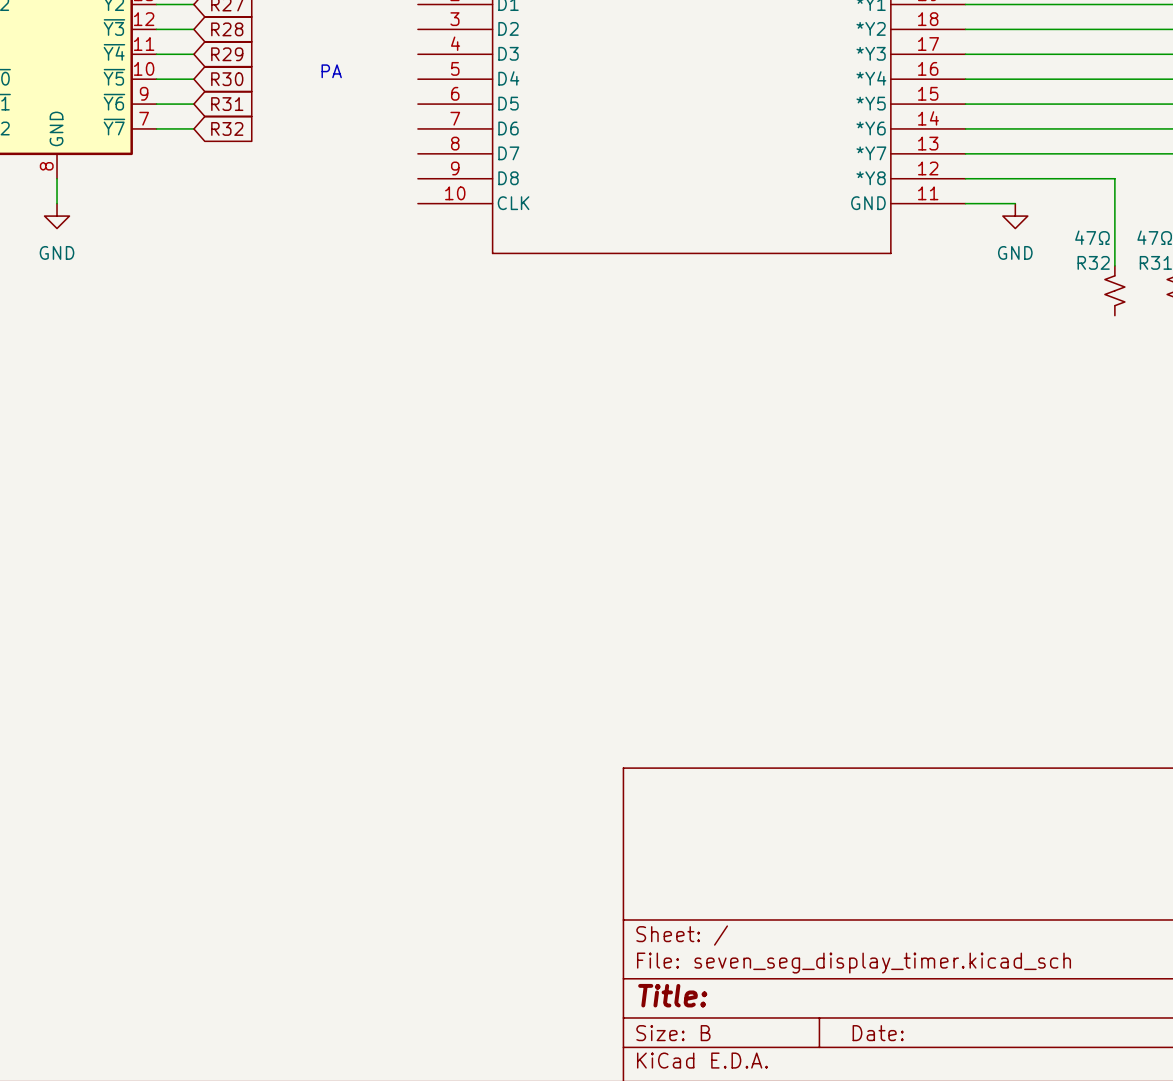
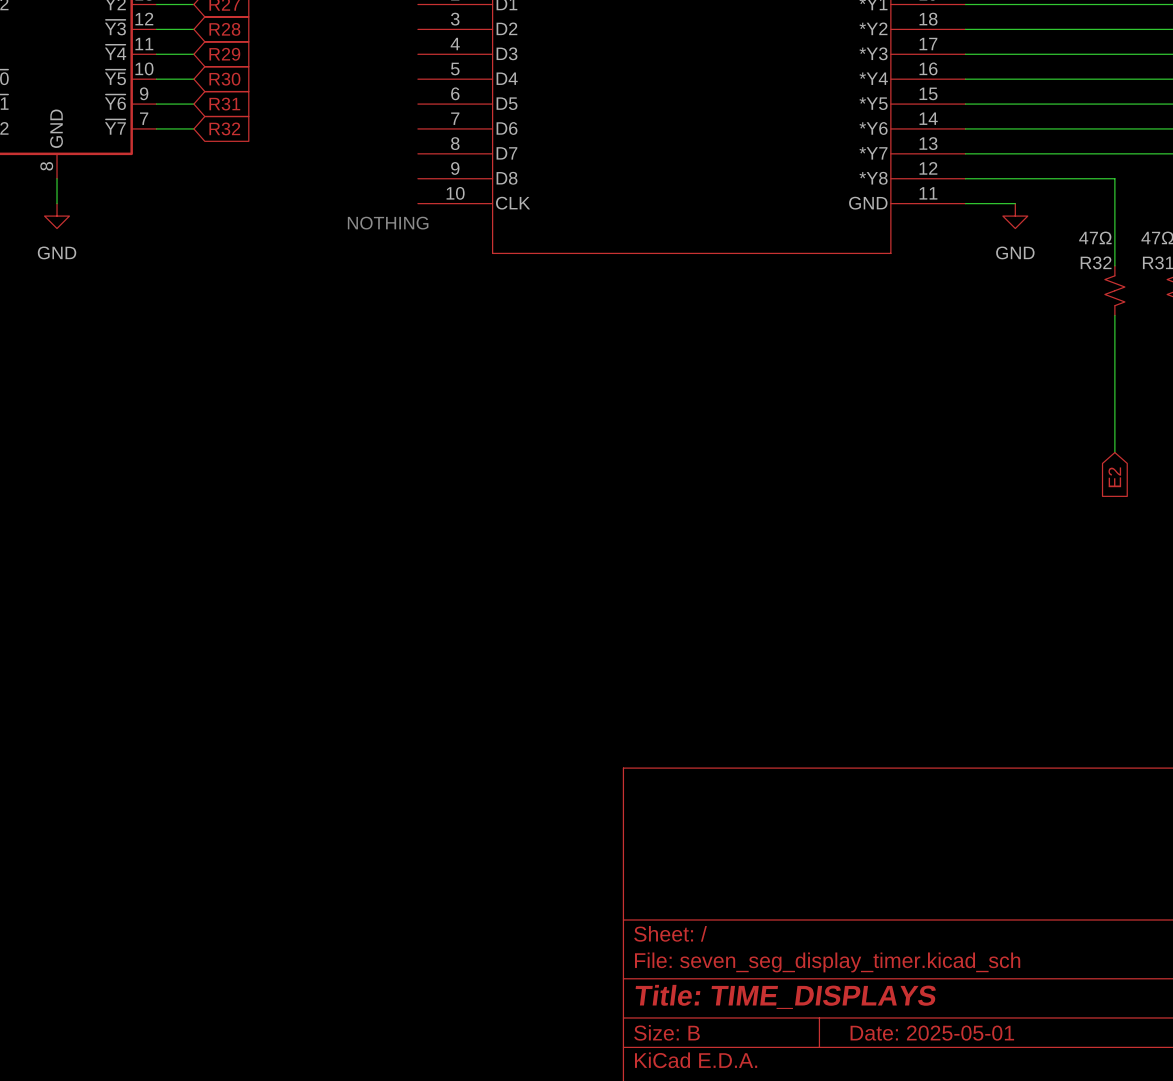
text: PA (331, 71) -> none
text: none -> NOTHING (388, 223)
wire: none -> (1114, 315) (1114, 452)
global label: none -> E2 (1114, 477)
title block: Title: (672, 995) -> Title: TIME_DISPLAYS (785, 996)
title block: Date: (878, 1033) -> Date: 2025-05-01 (932, 1033)

